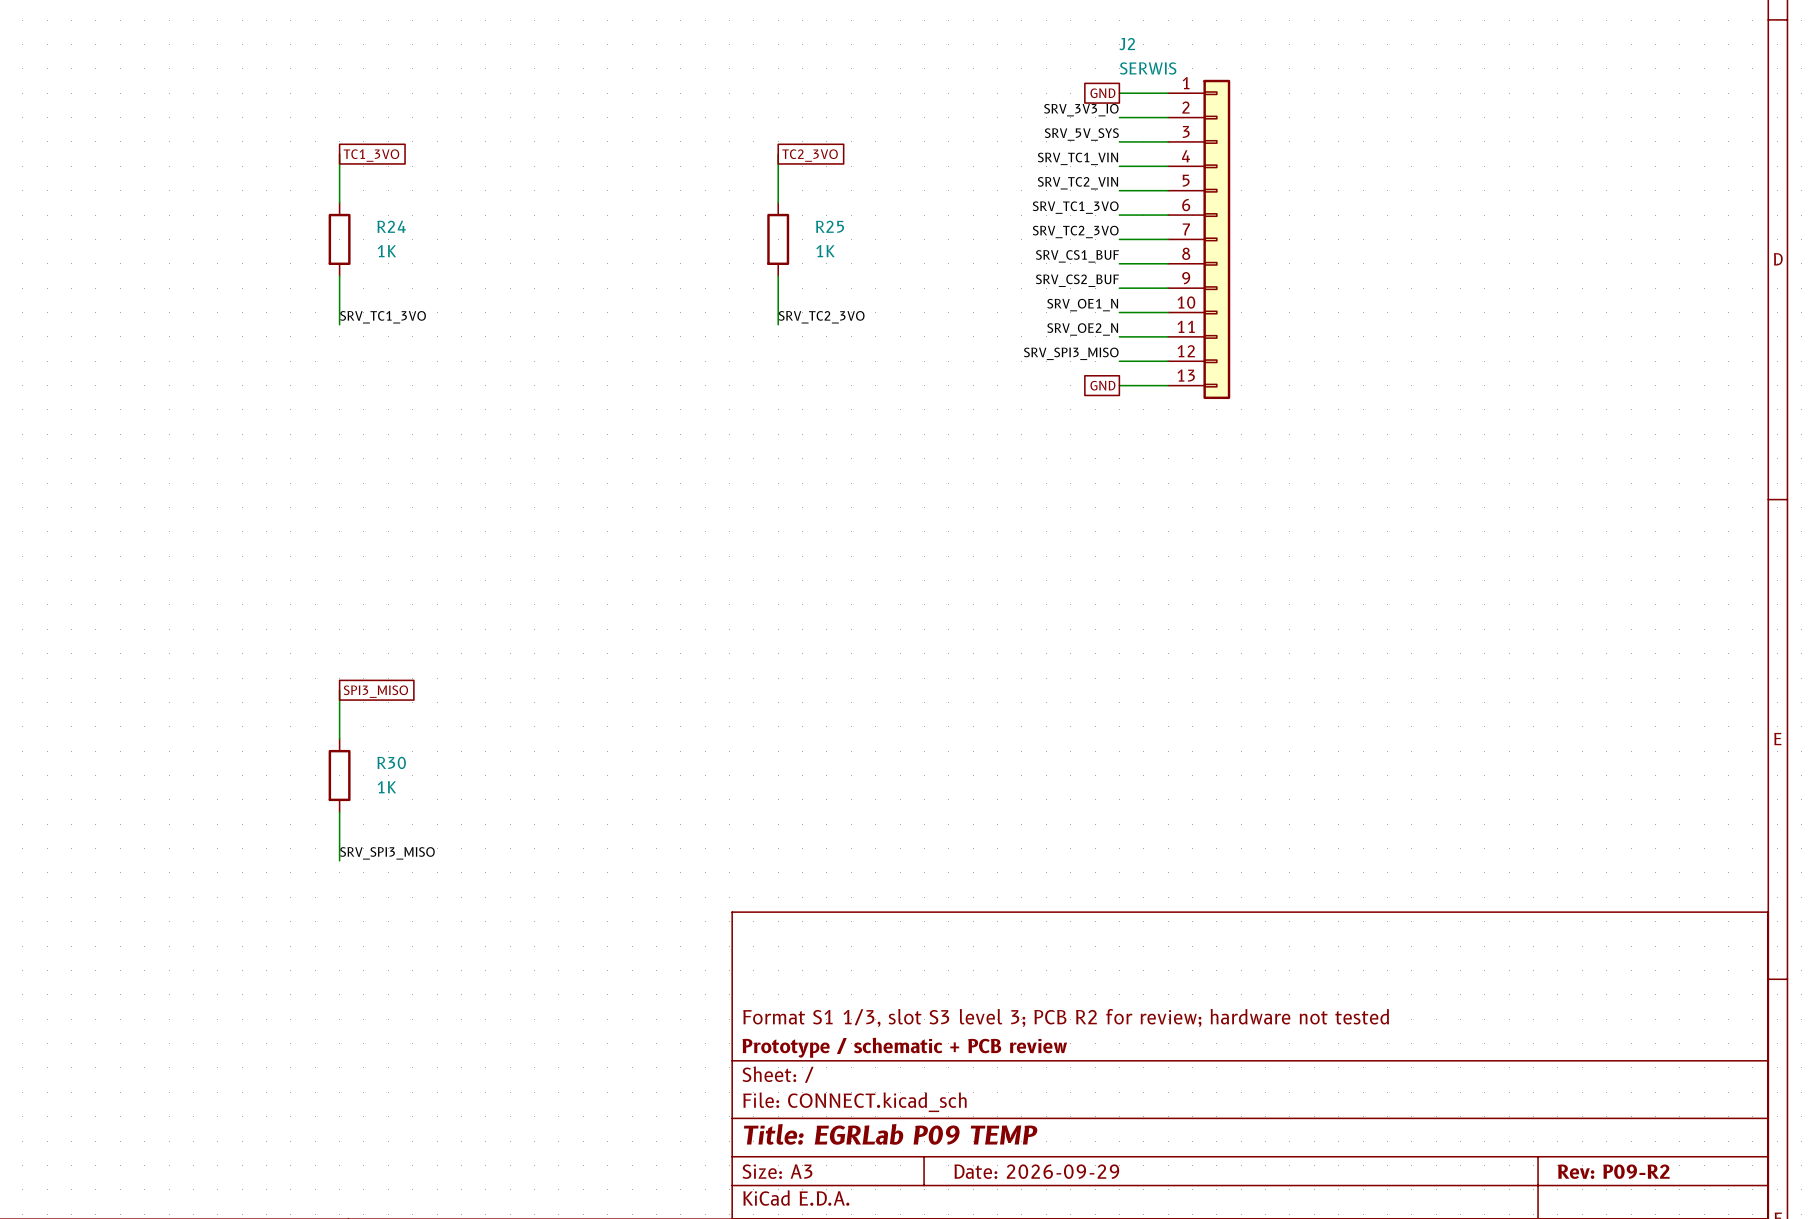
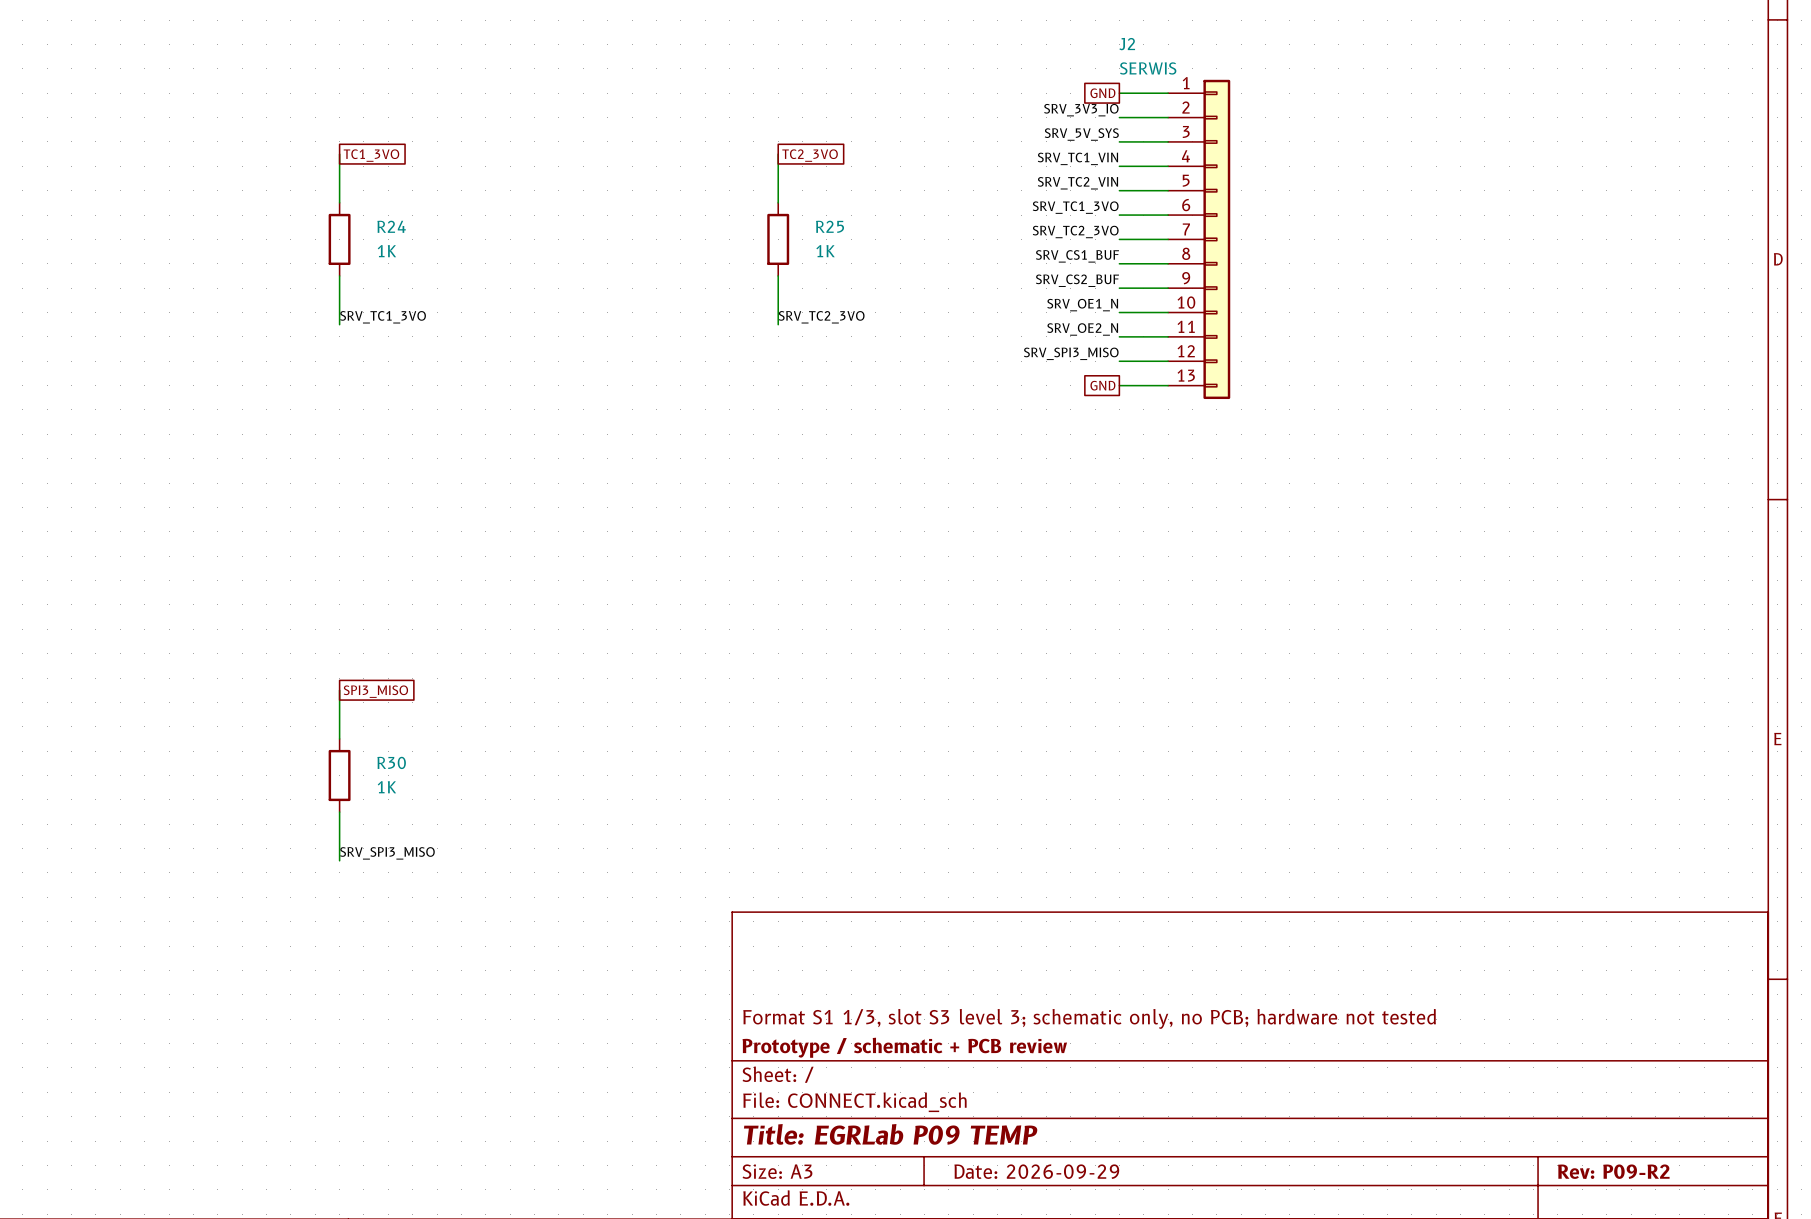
title block: Format S1 1/3, slot S3 level 3; PCB R2 for review; hardware not tested (1066, 1018) -> Format S1 1/3, slot S3 level 3; schematic only, no PCB; hardware not tested (1089, 1018)

